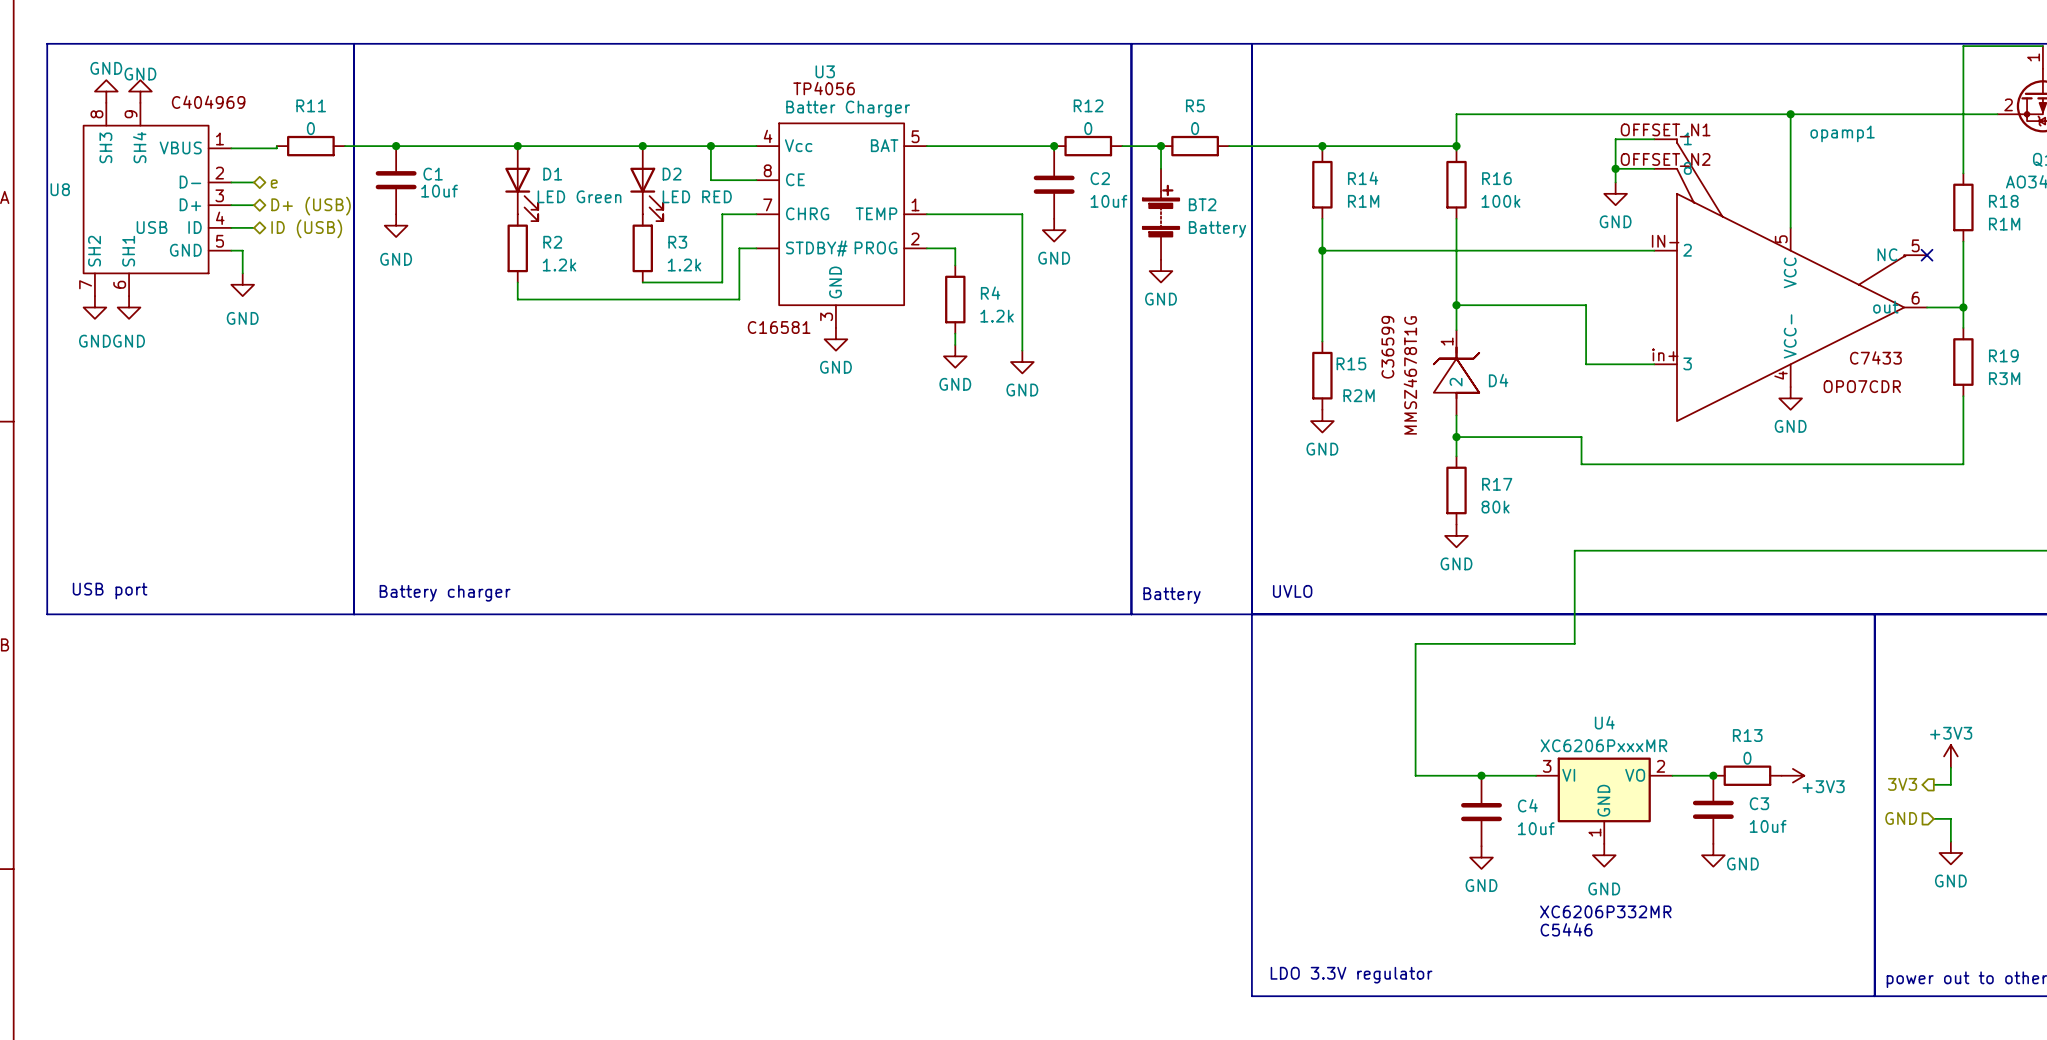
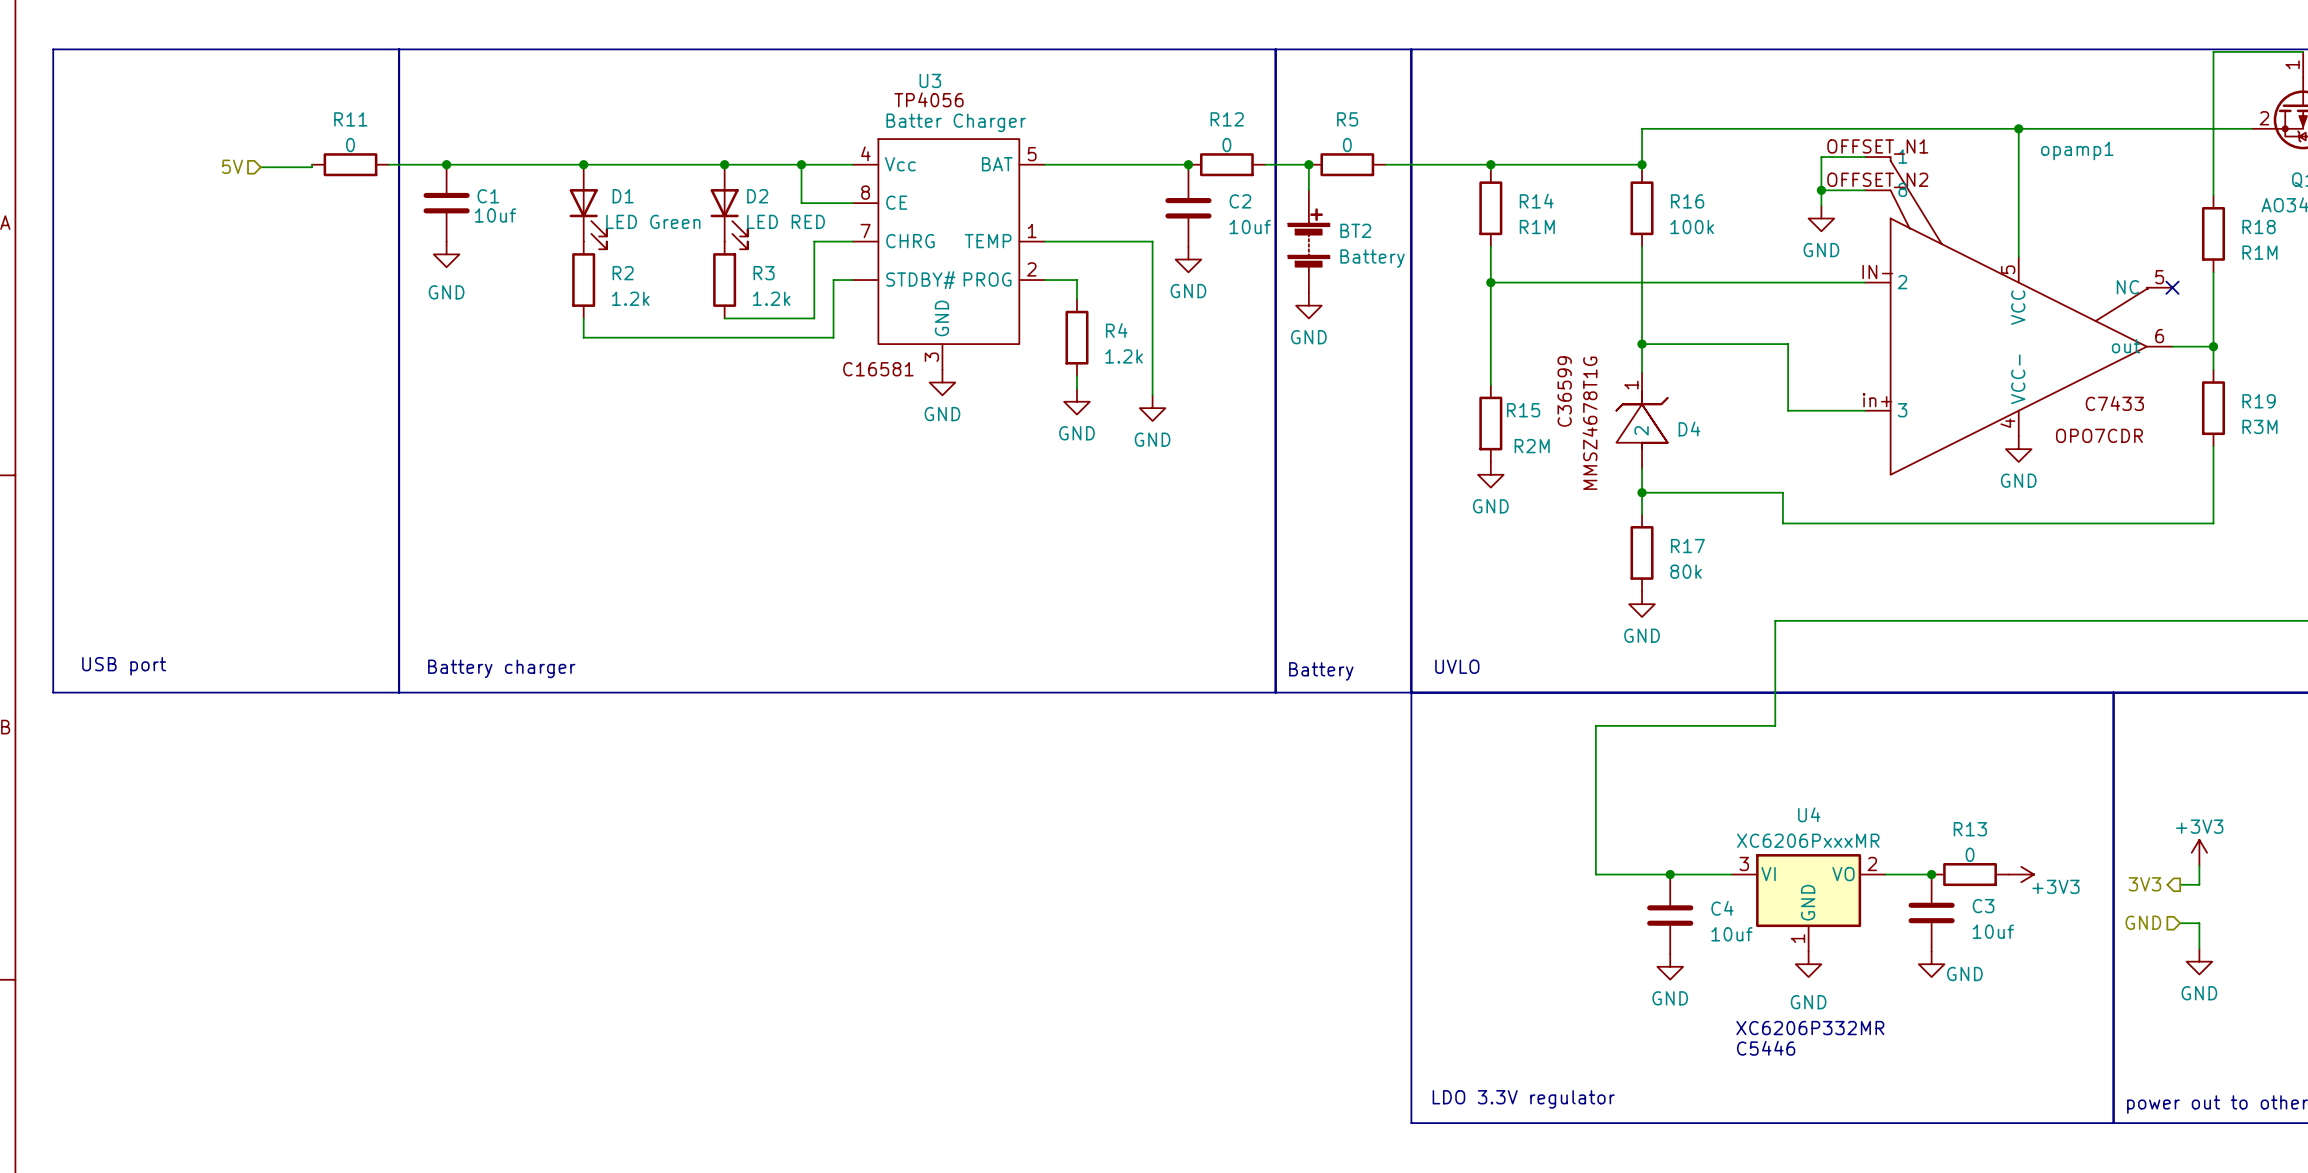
power symbol: GND (106, 91) -> none
power symbol: GND (140, 91) -> none
hierarchical label: none -> 5V (232, 166)
wire: (231, 182) (254, 182) -> none
hierarchical label: e (274, 183) -> none
U8: USB (157, 199) -> none
wire: (231, 205) (254, 205) -> none
hierarchical label: D+ (USB) (311, 206) -> none
wire: (231, 227) (254, 227) -> none
hierarchical label: ID (USB) (306, 228) -> none
wire: (231, 250) (242, 250) (242, 273) -> none
power symbol: GND (242, 284) -> none
power symbol: GND (94, 307) -> none
power symbol: GND (129, 307) -> none

